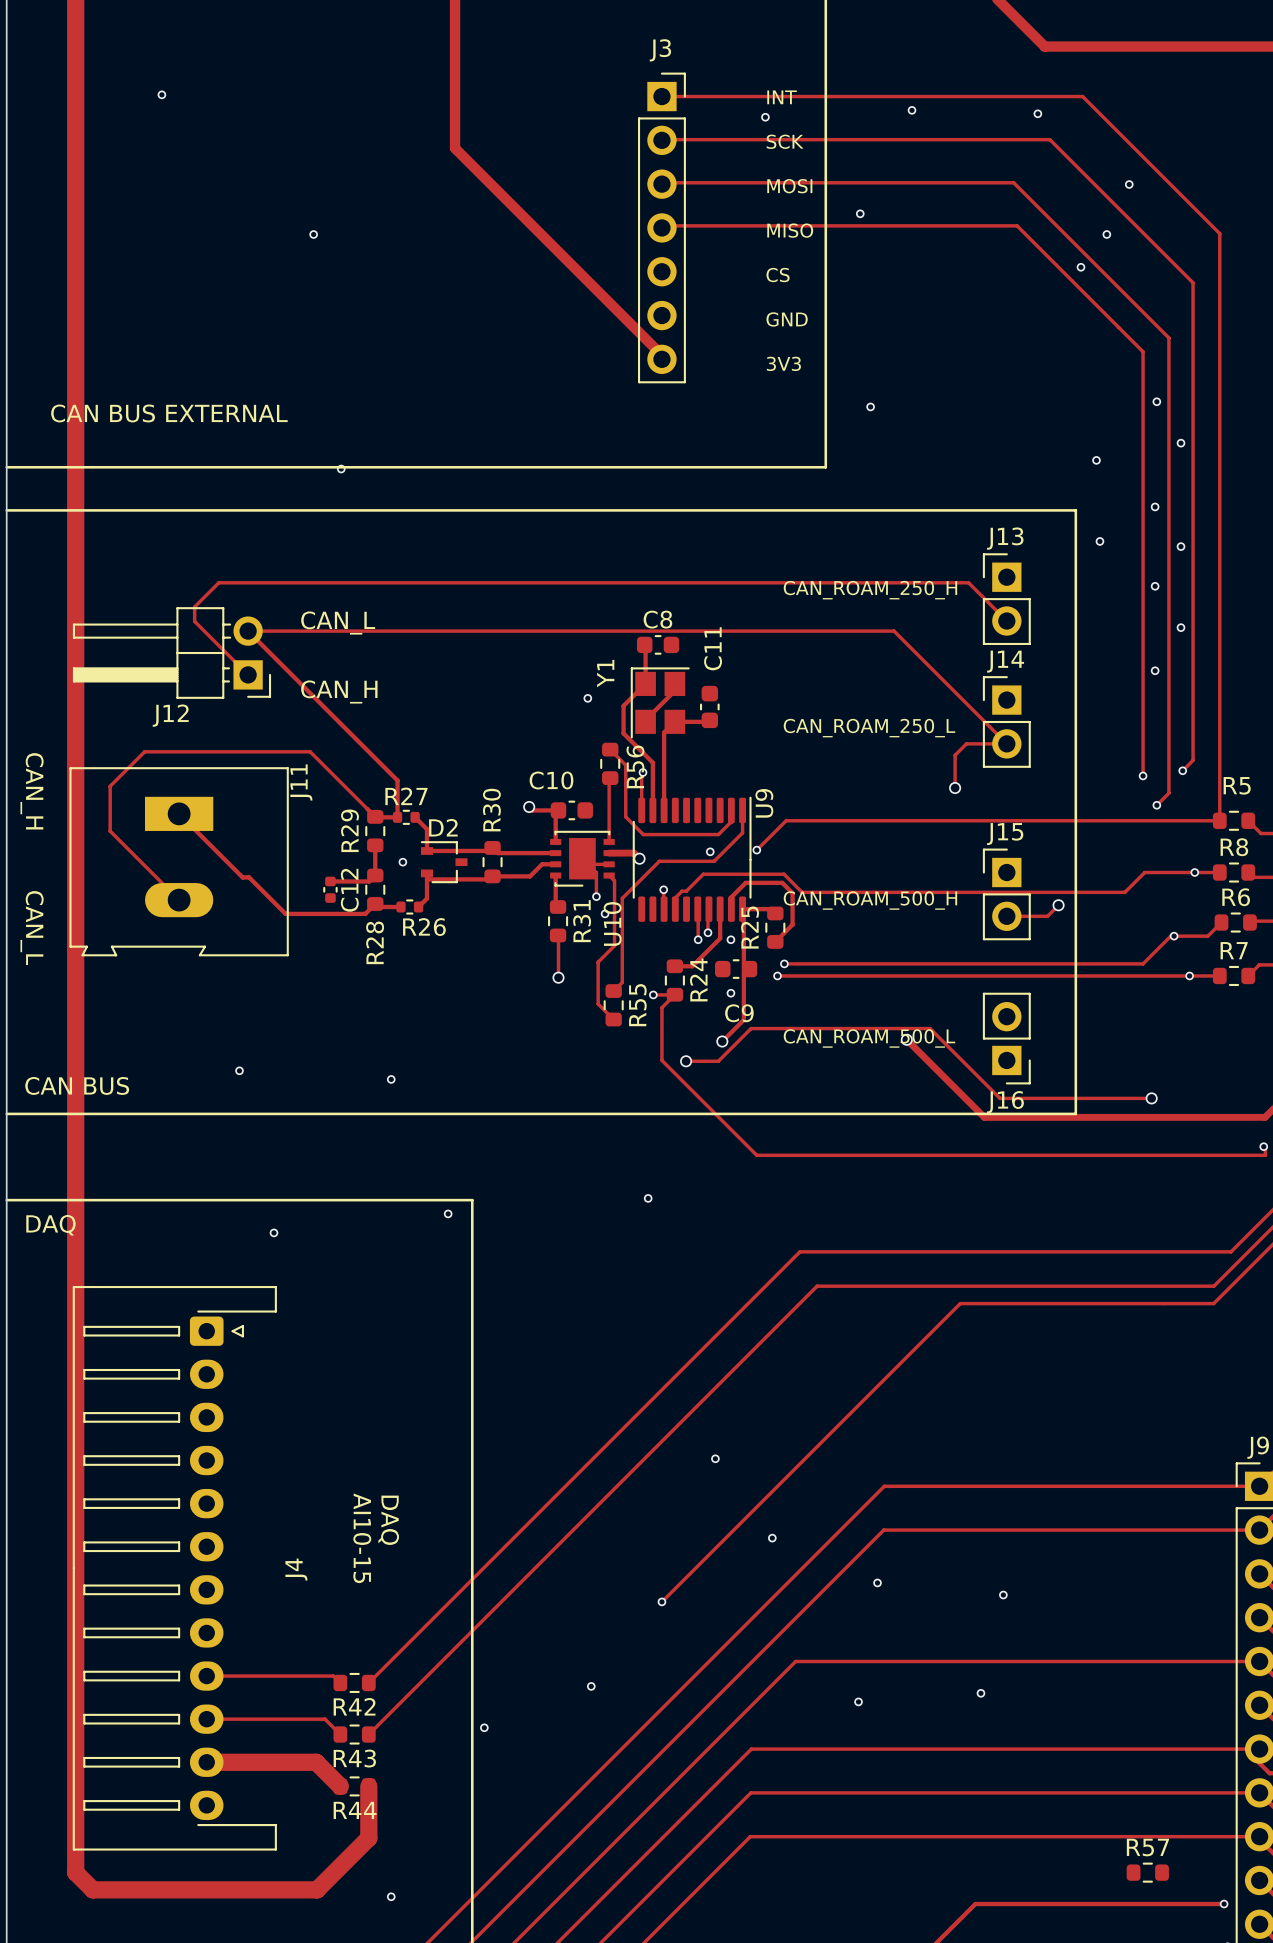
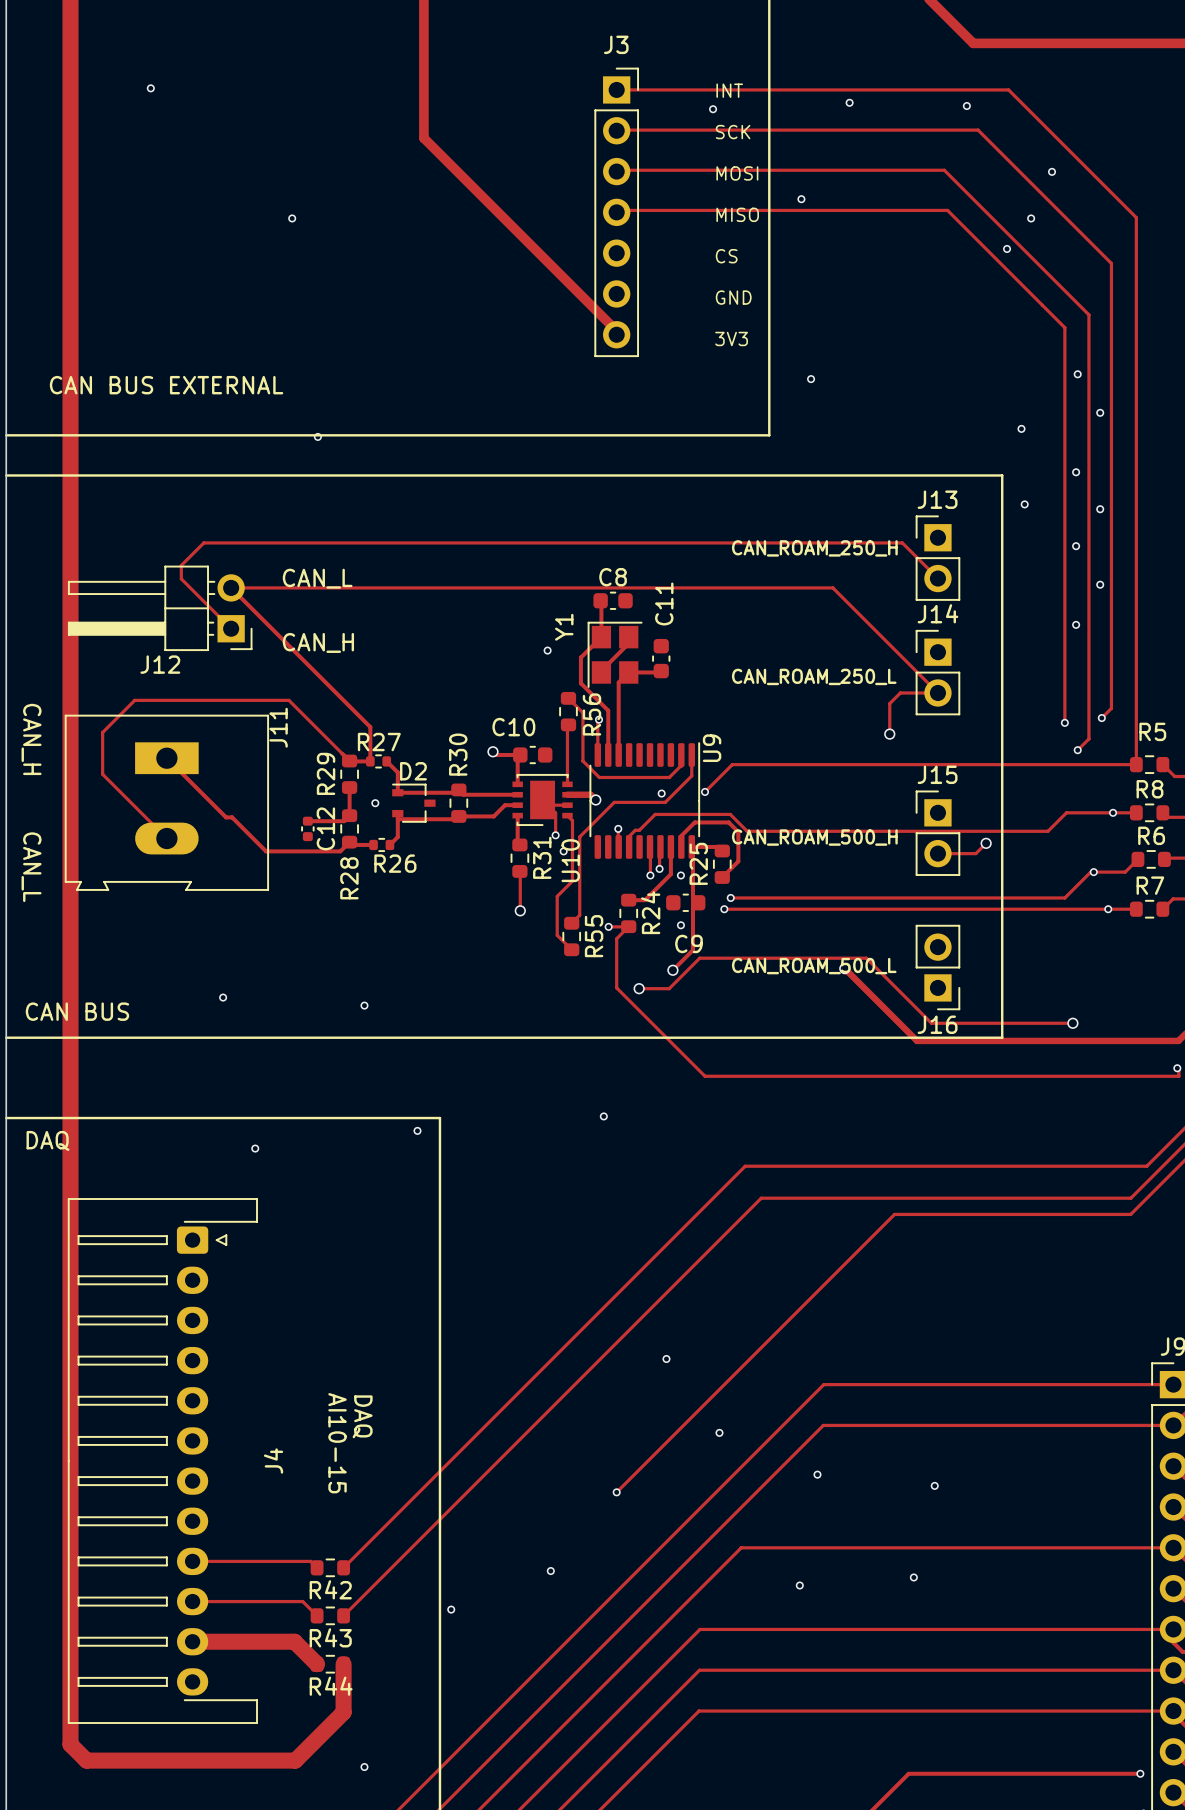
R57: (1147, 1872) -> none

